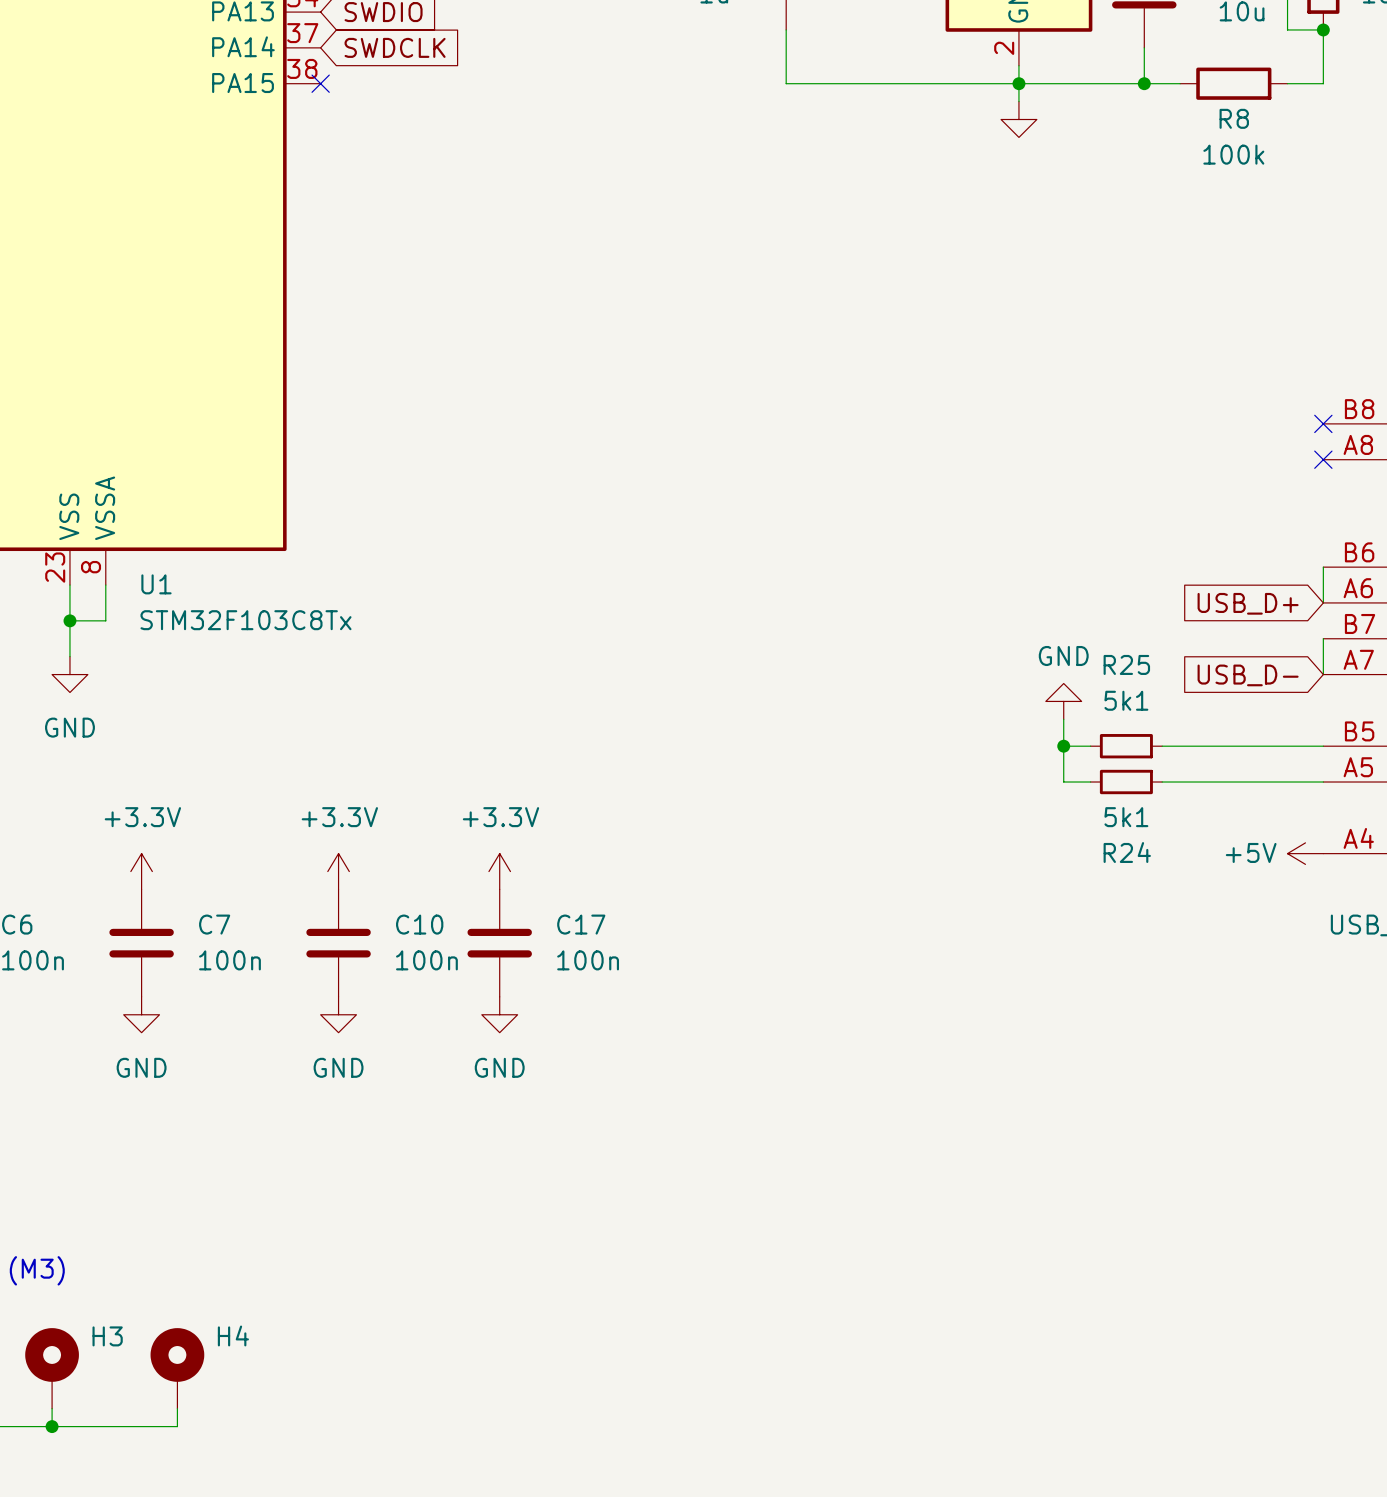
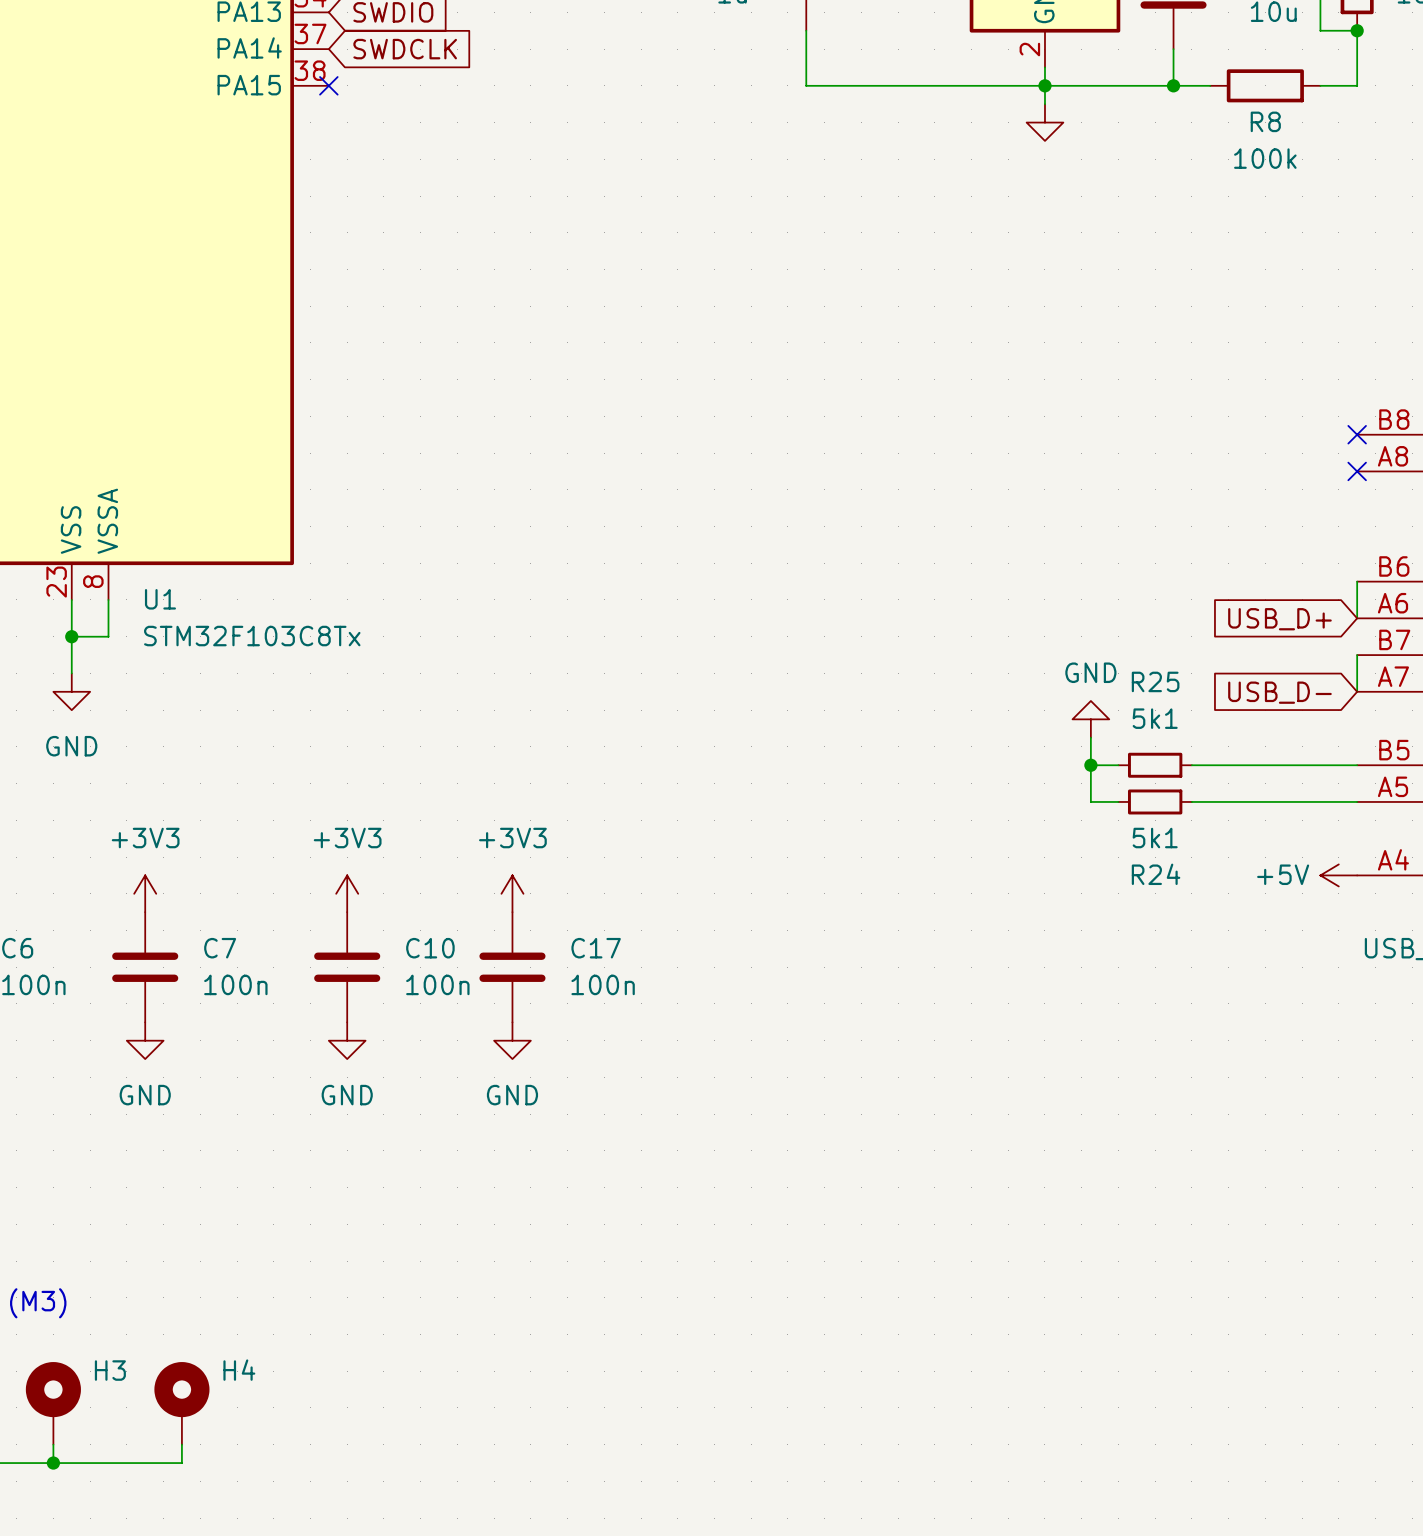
power symbol: +3.3V (141, 871) -> +3V3 (145, 893)
power symbol: +3.3V (338, 871) -> +3V3 (347, 893)
power symbol: +3.3V (499, 871) -> +3V3 (512, 893)

